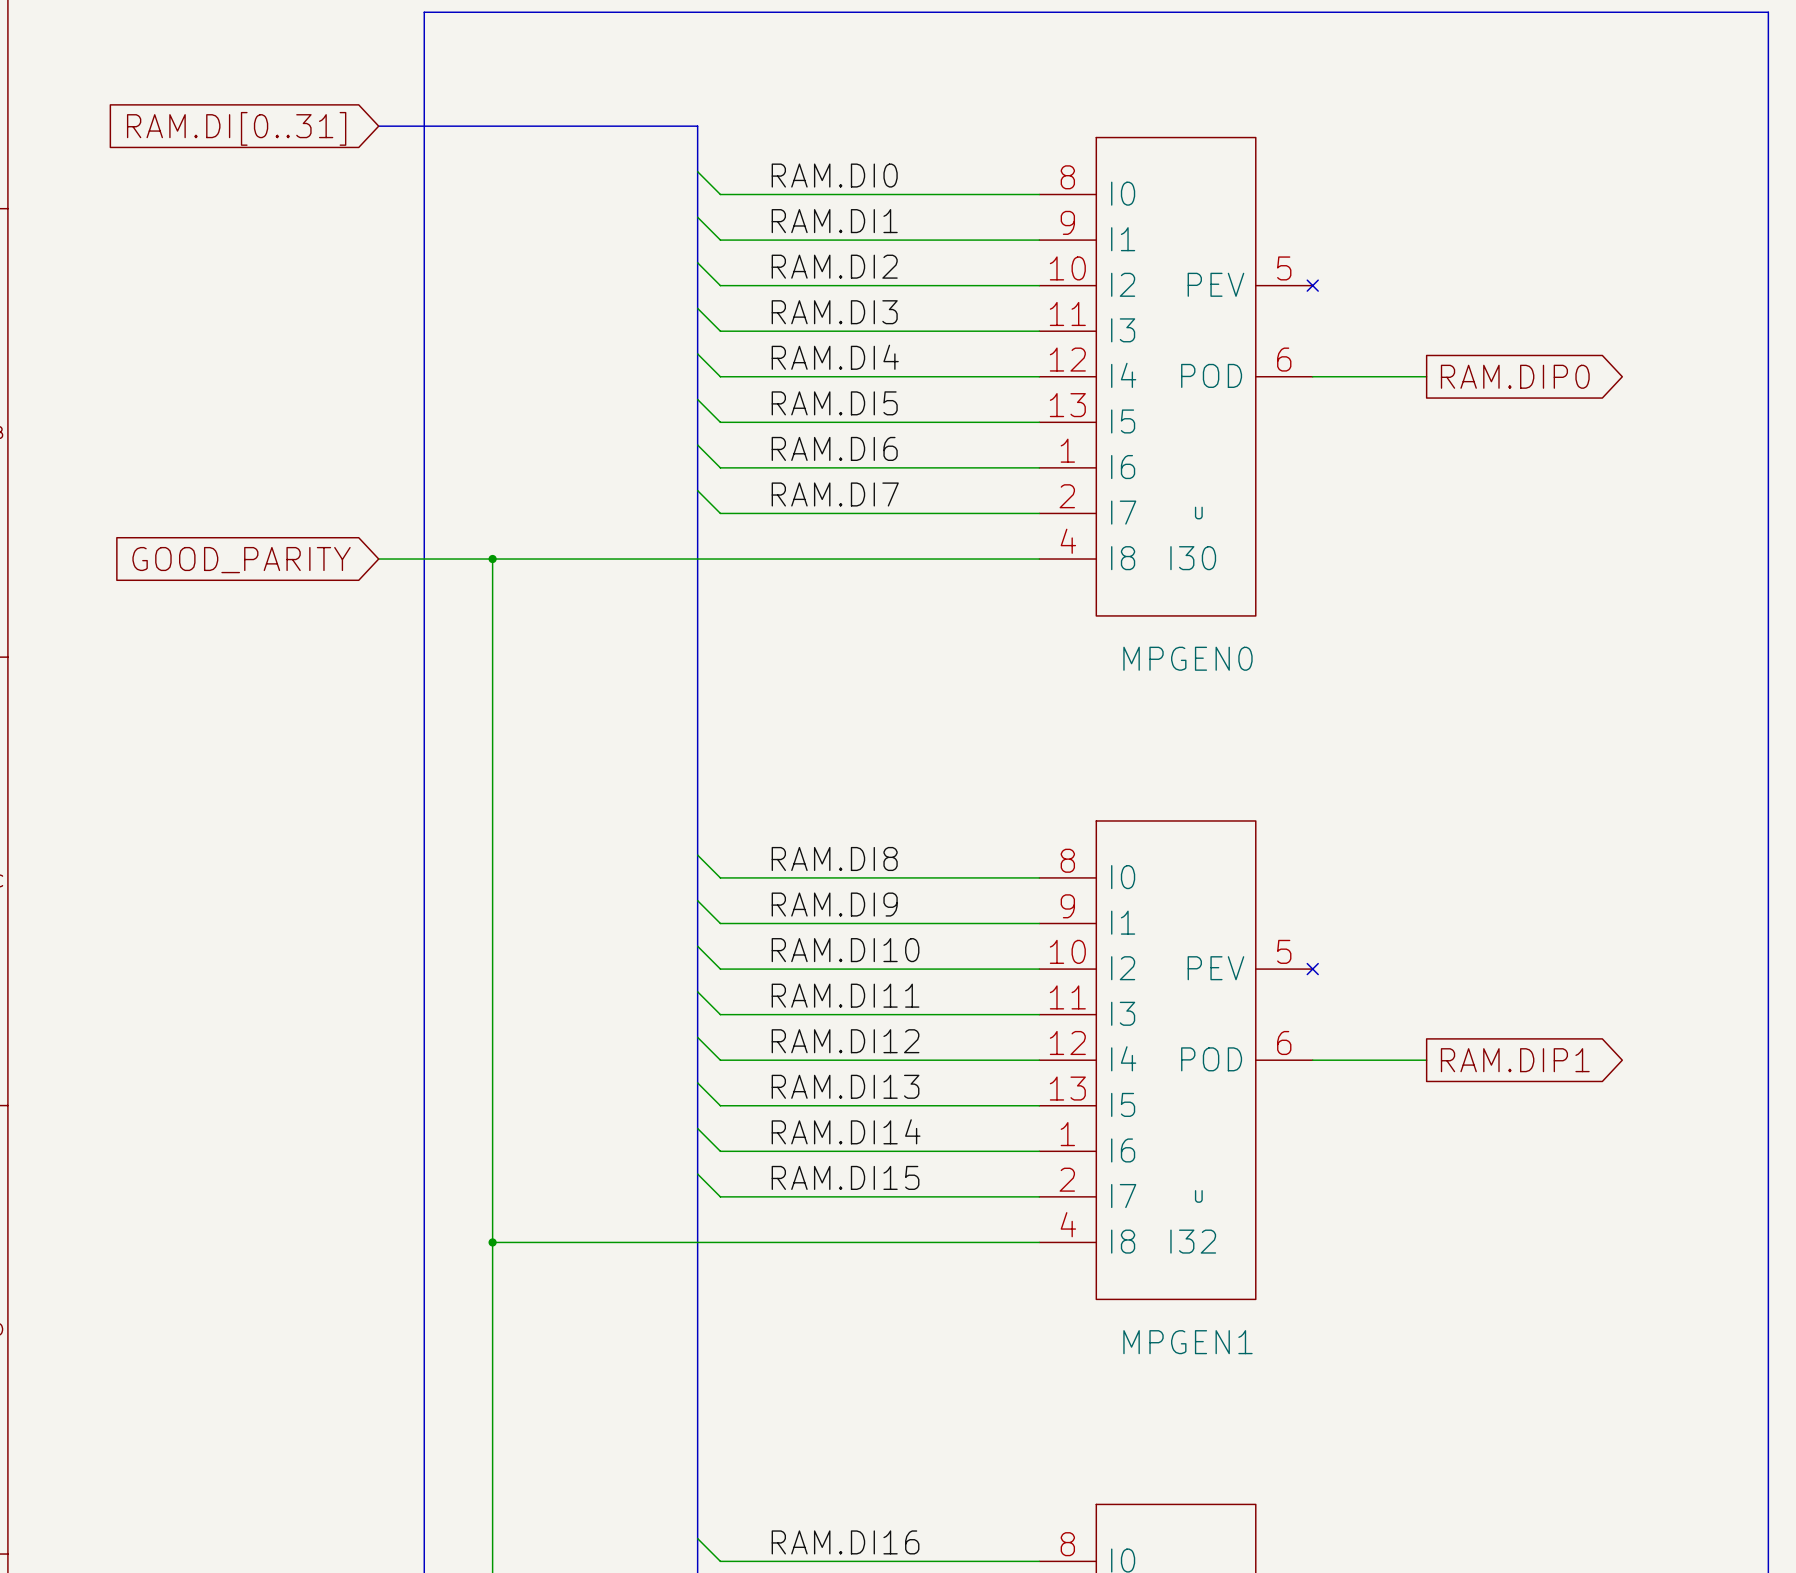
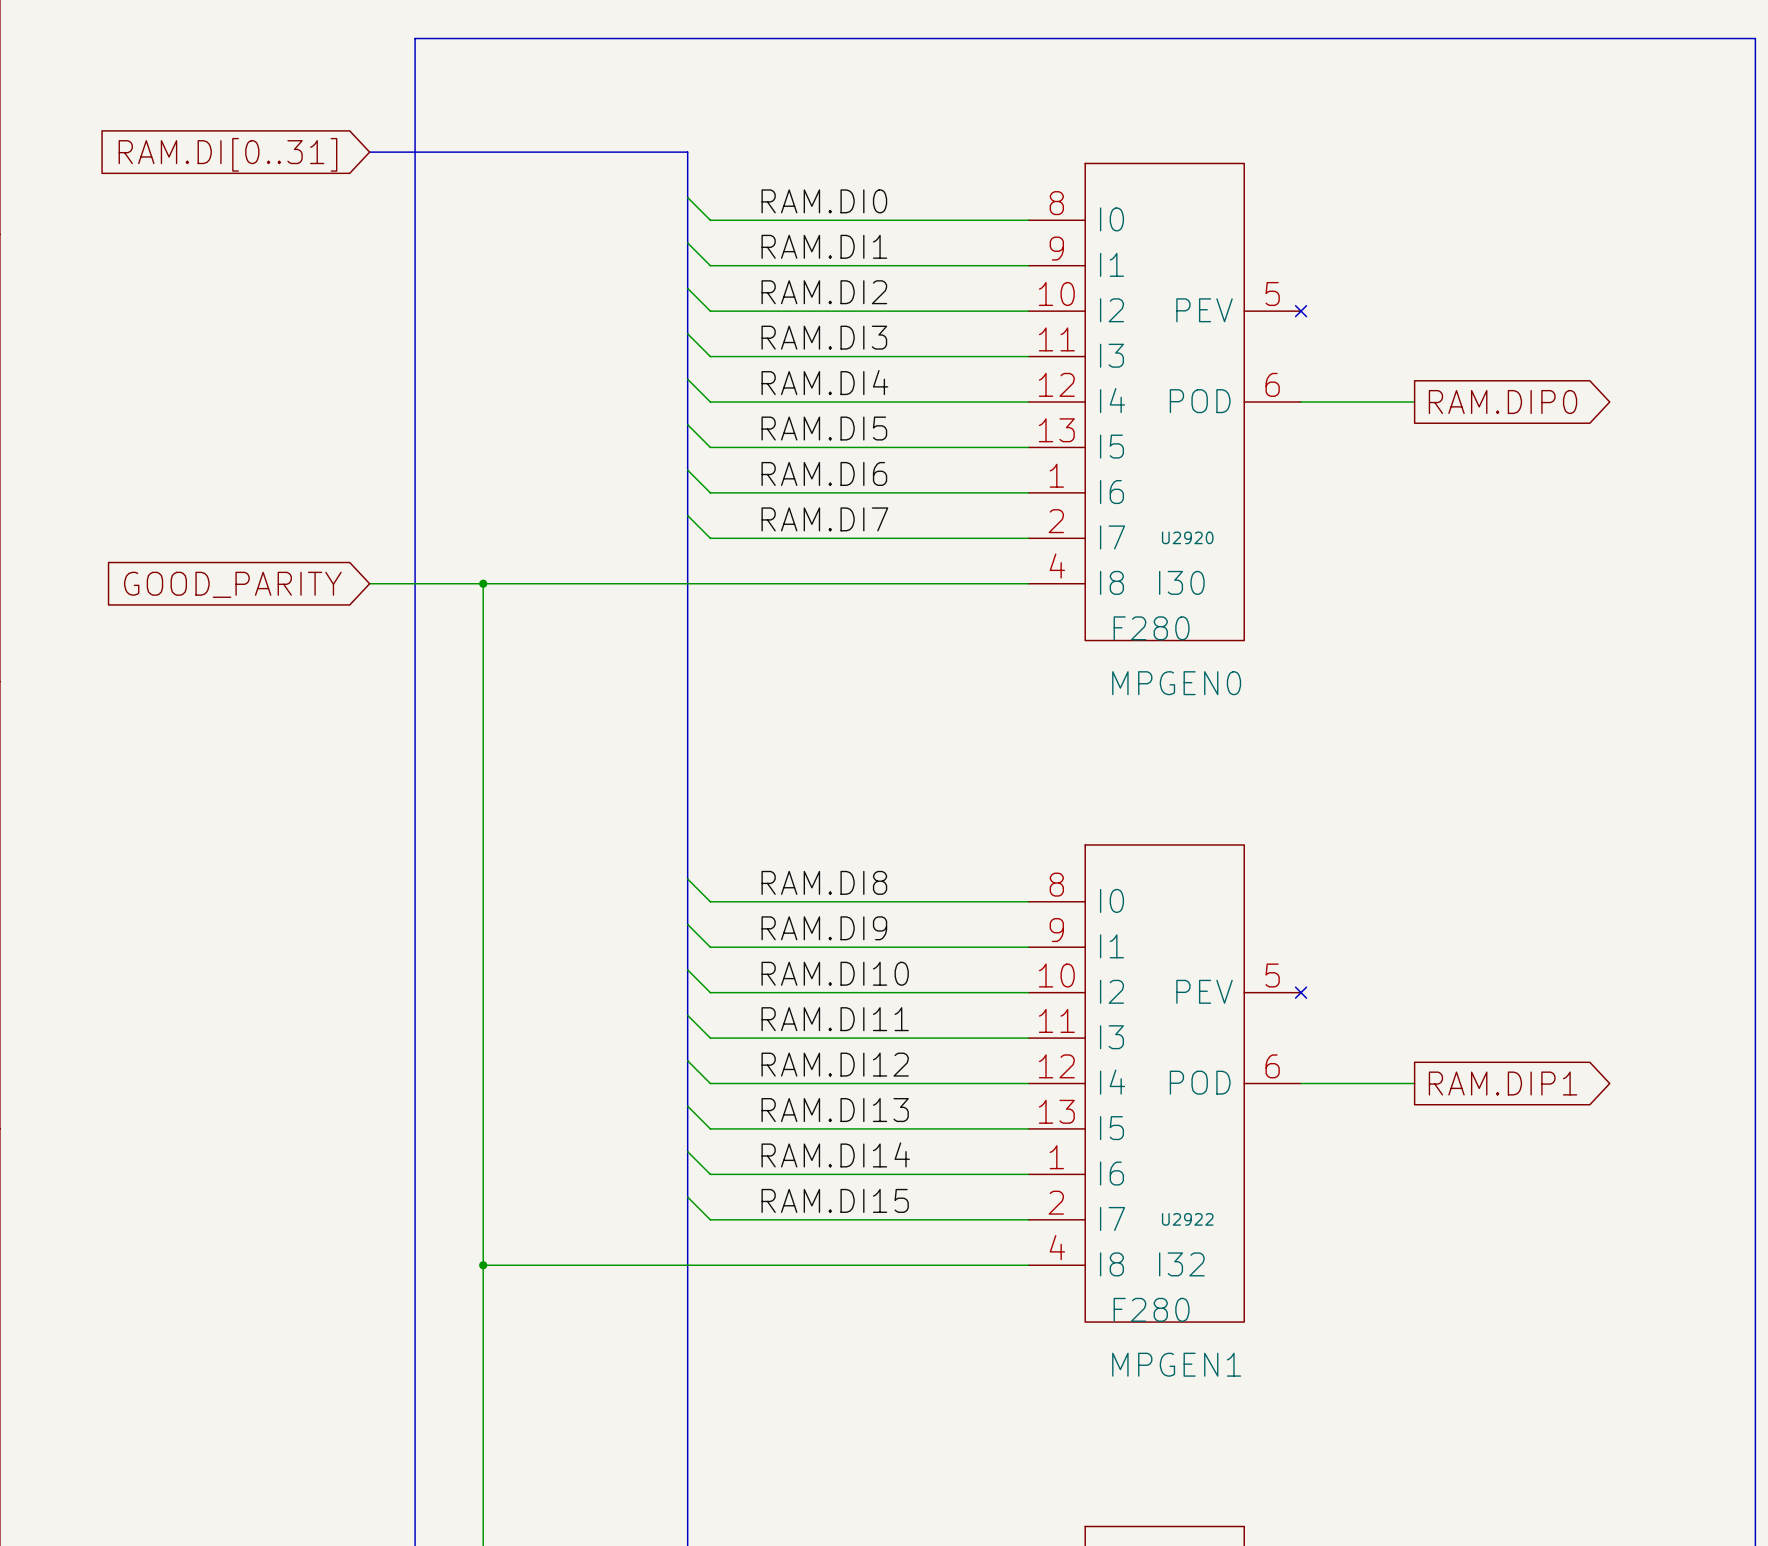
U name: U (1198, 513) -> U2920 (1187, 537)
U value: none -> F280 (1151, 628)
U name: U (1198, 1196) -> U2922 (1187, 1219)
U value: none -> F280 (1151, 1309)

